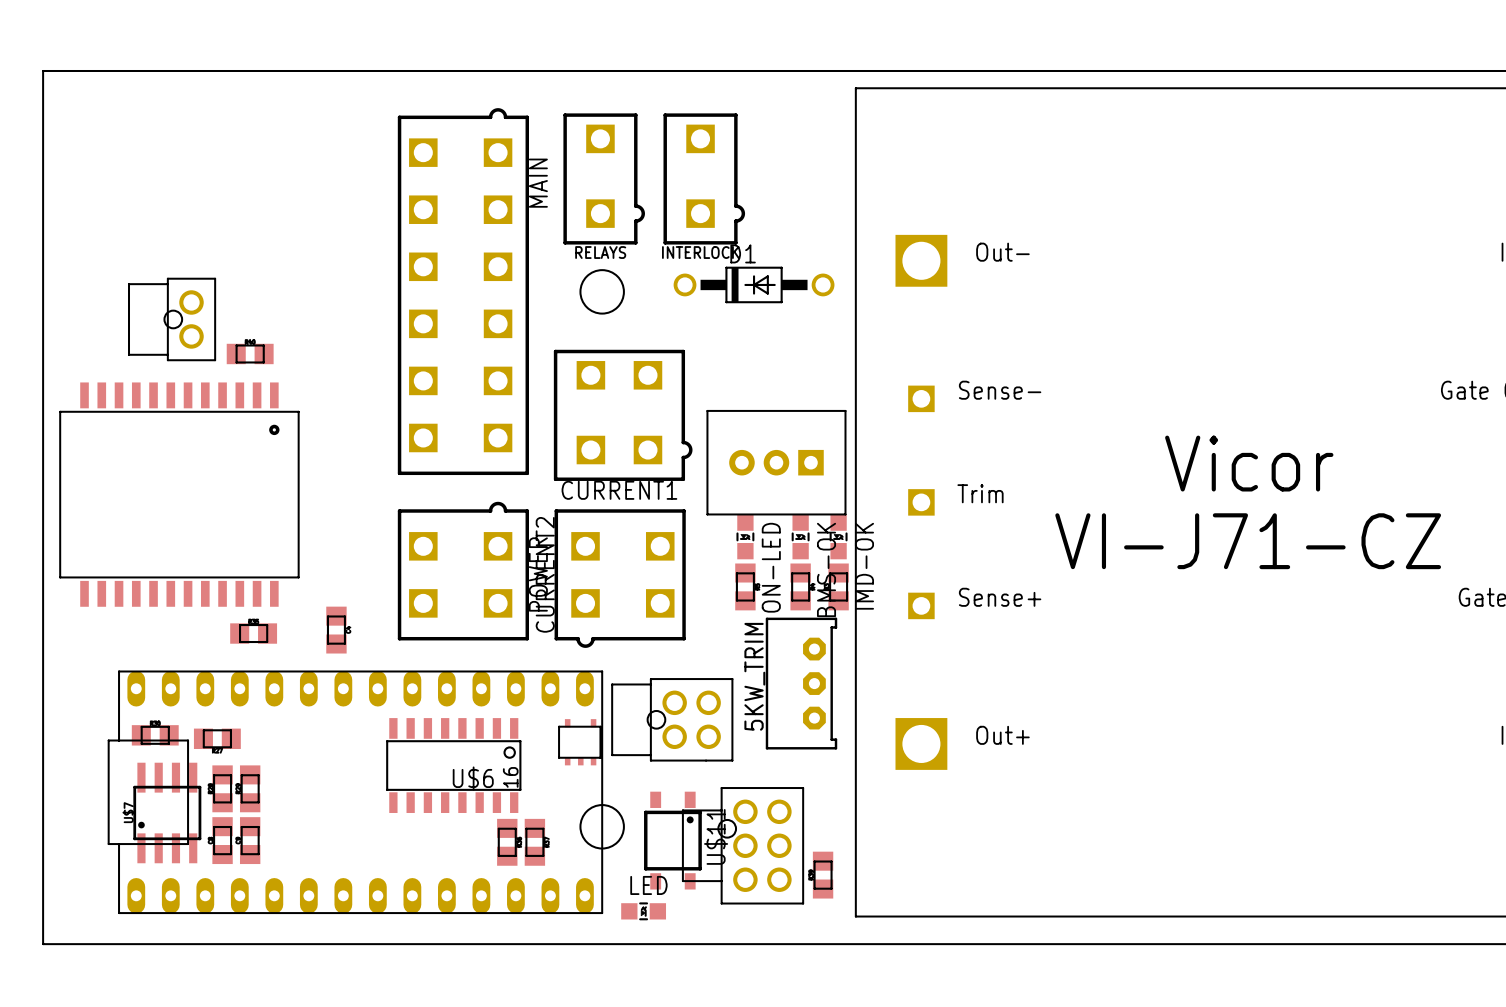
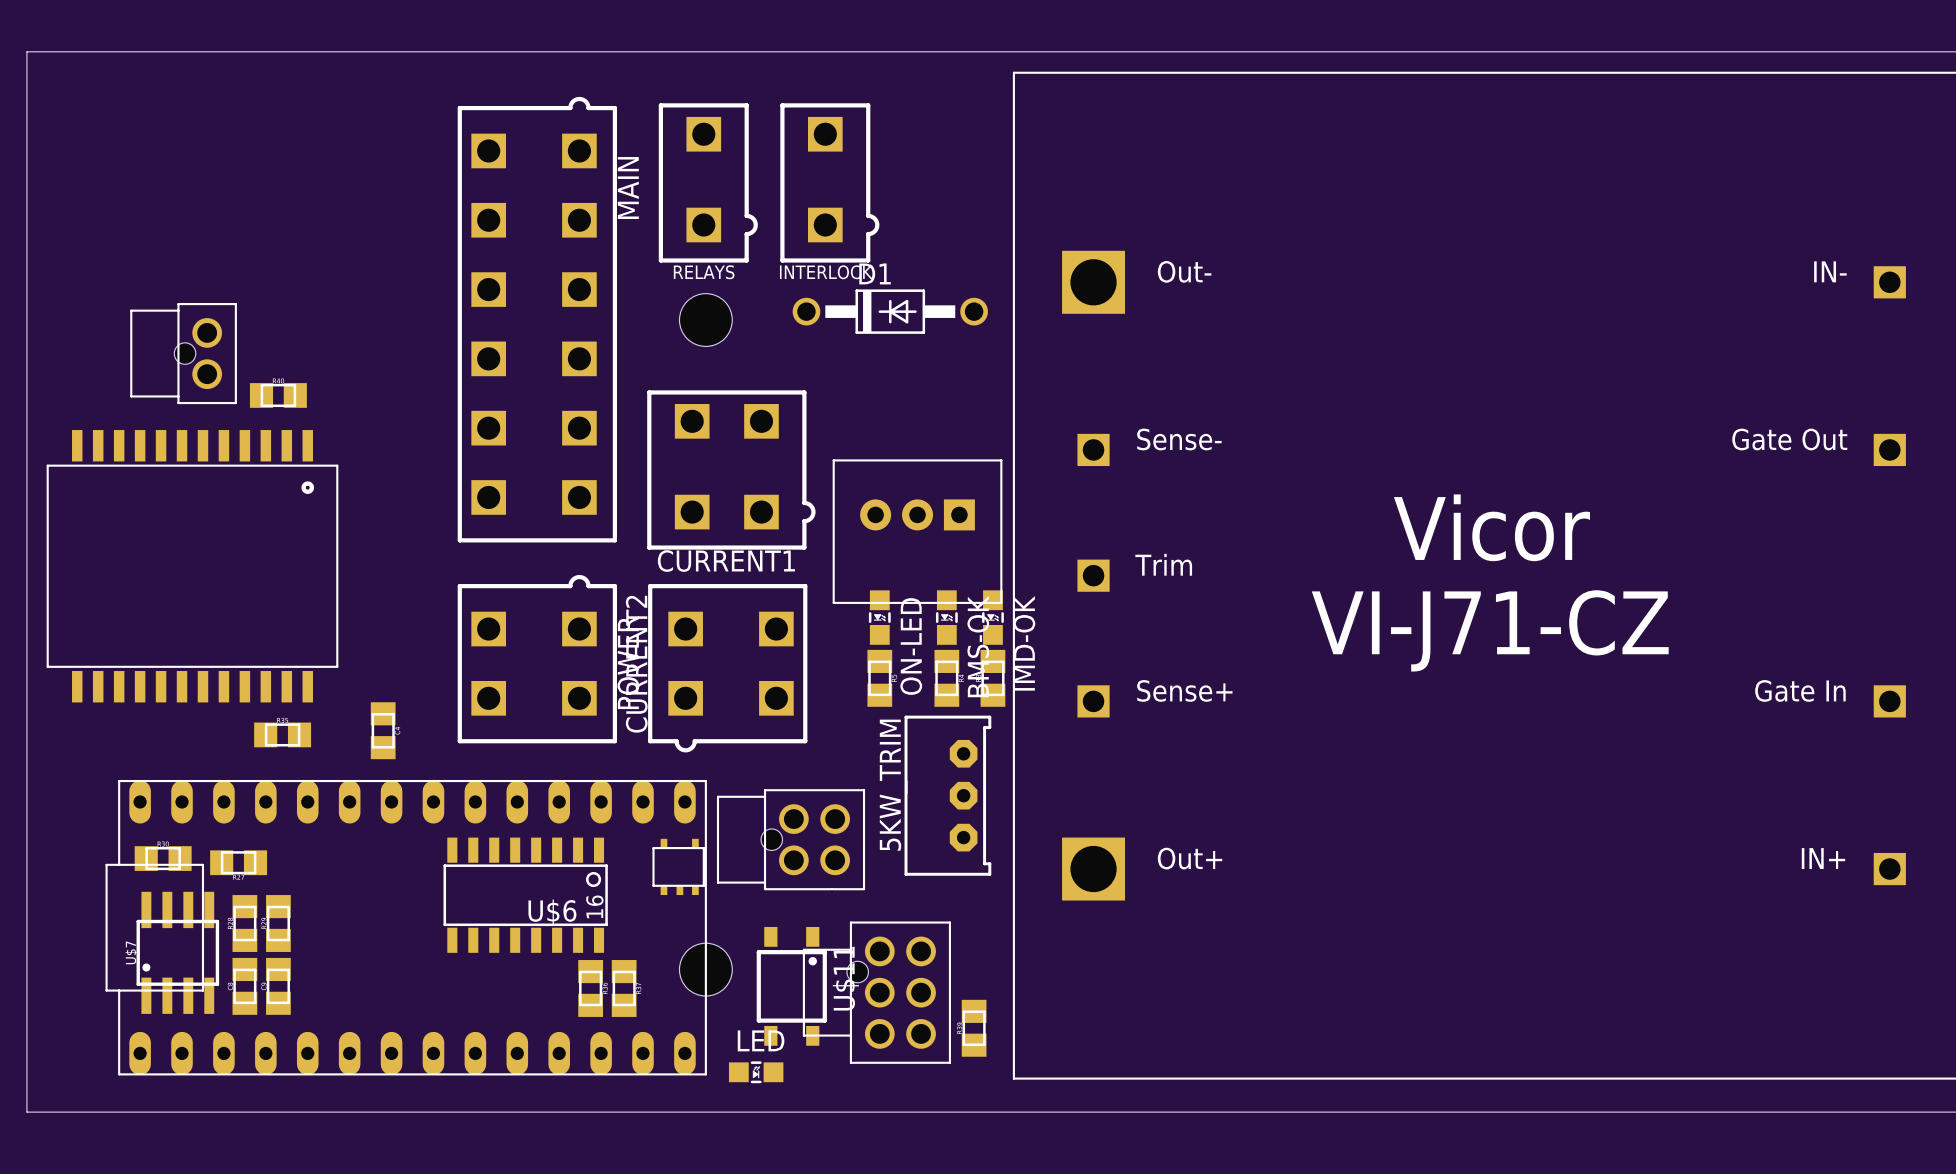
part footprint: [706, 410, 847, 516] -> [832, 459, 1003, 604]

